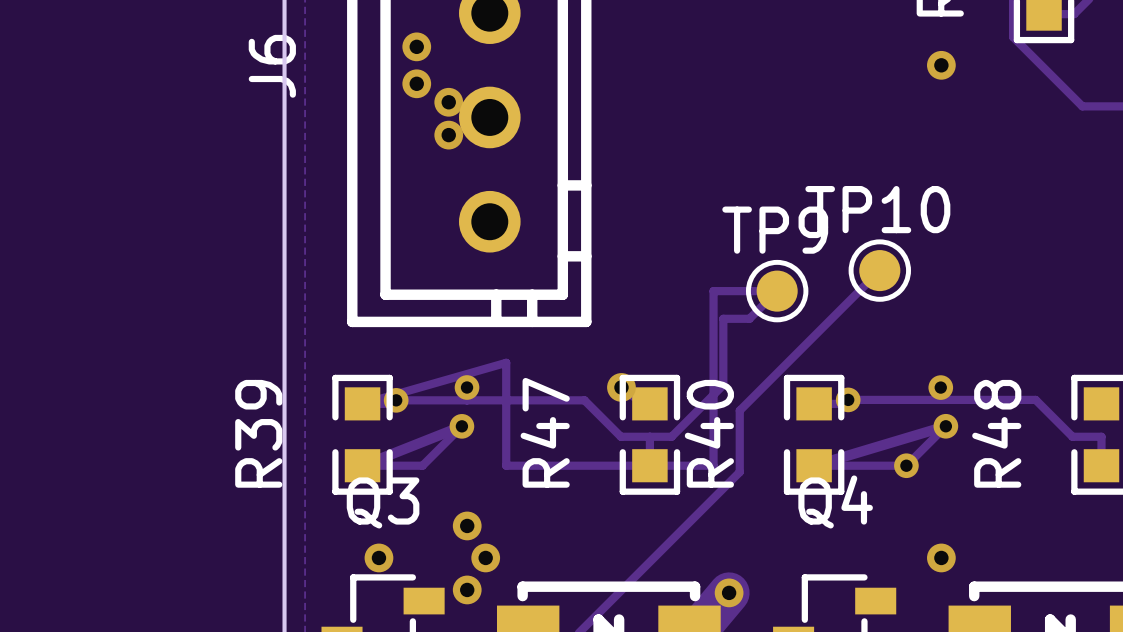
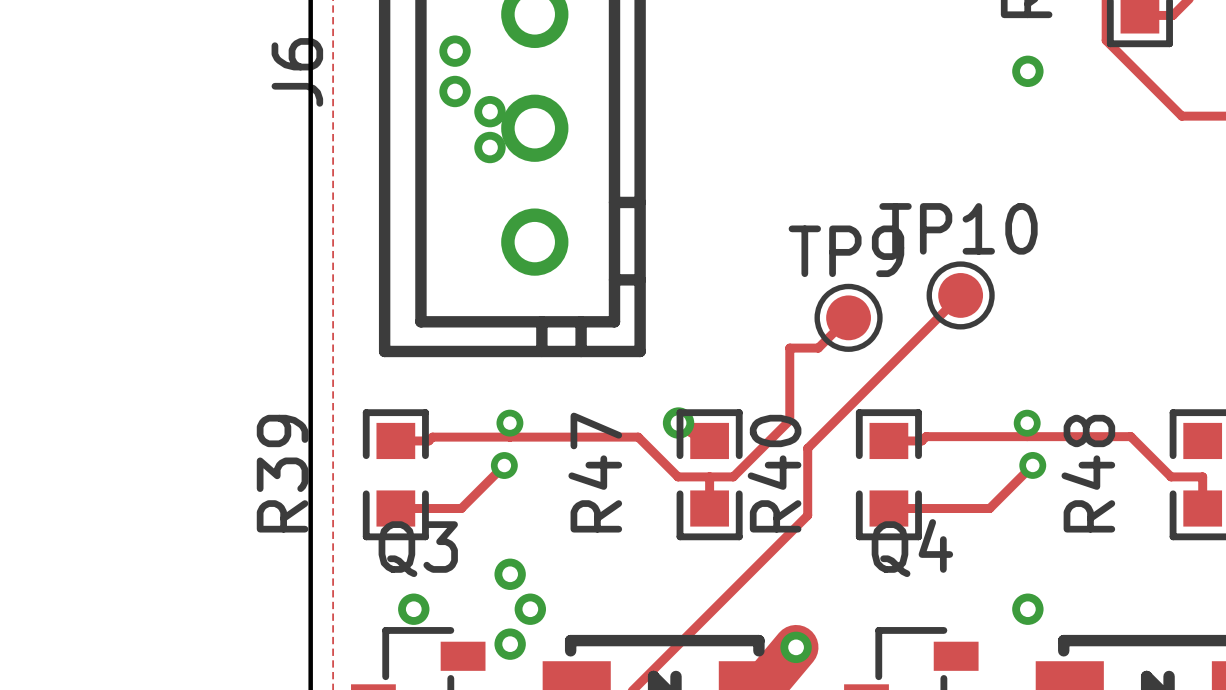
track: (777, 291) (713, 291) (713, 465) (506, 465) (506, 362) (362, 403) -> none
via: (848, 399) -> none
via: (396, 400) -> none
track: (461, 426) (362, 465) -> none
track: (945, 426) (814, 465) -> none
via: (906, 465) -> none

